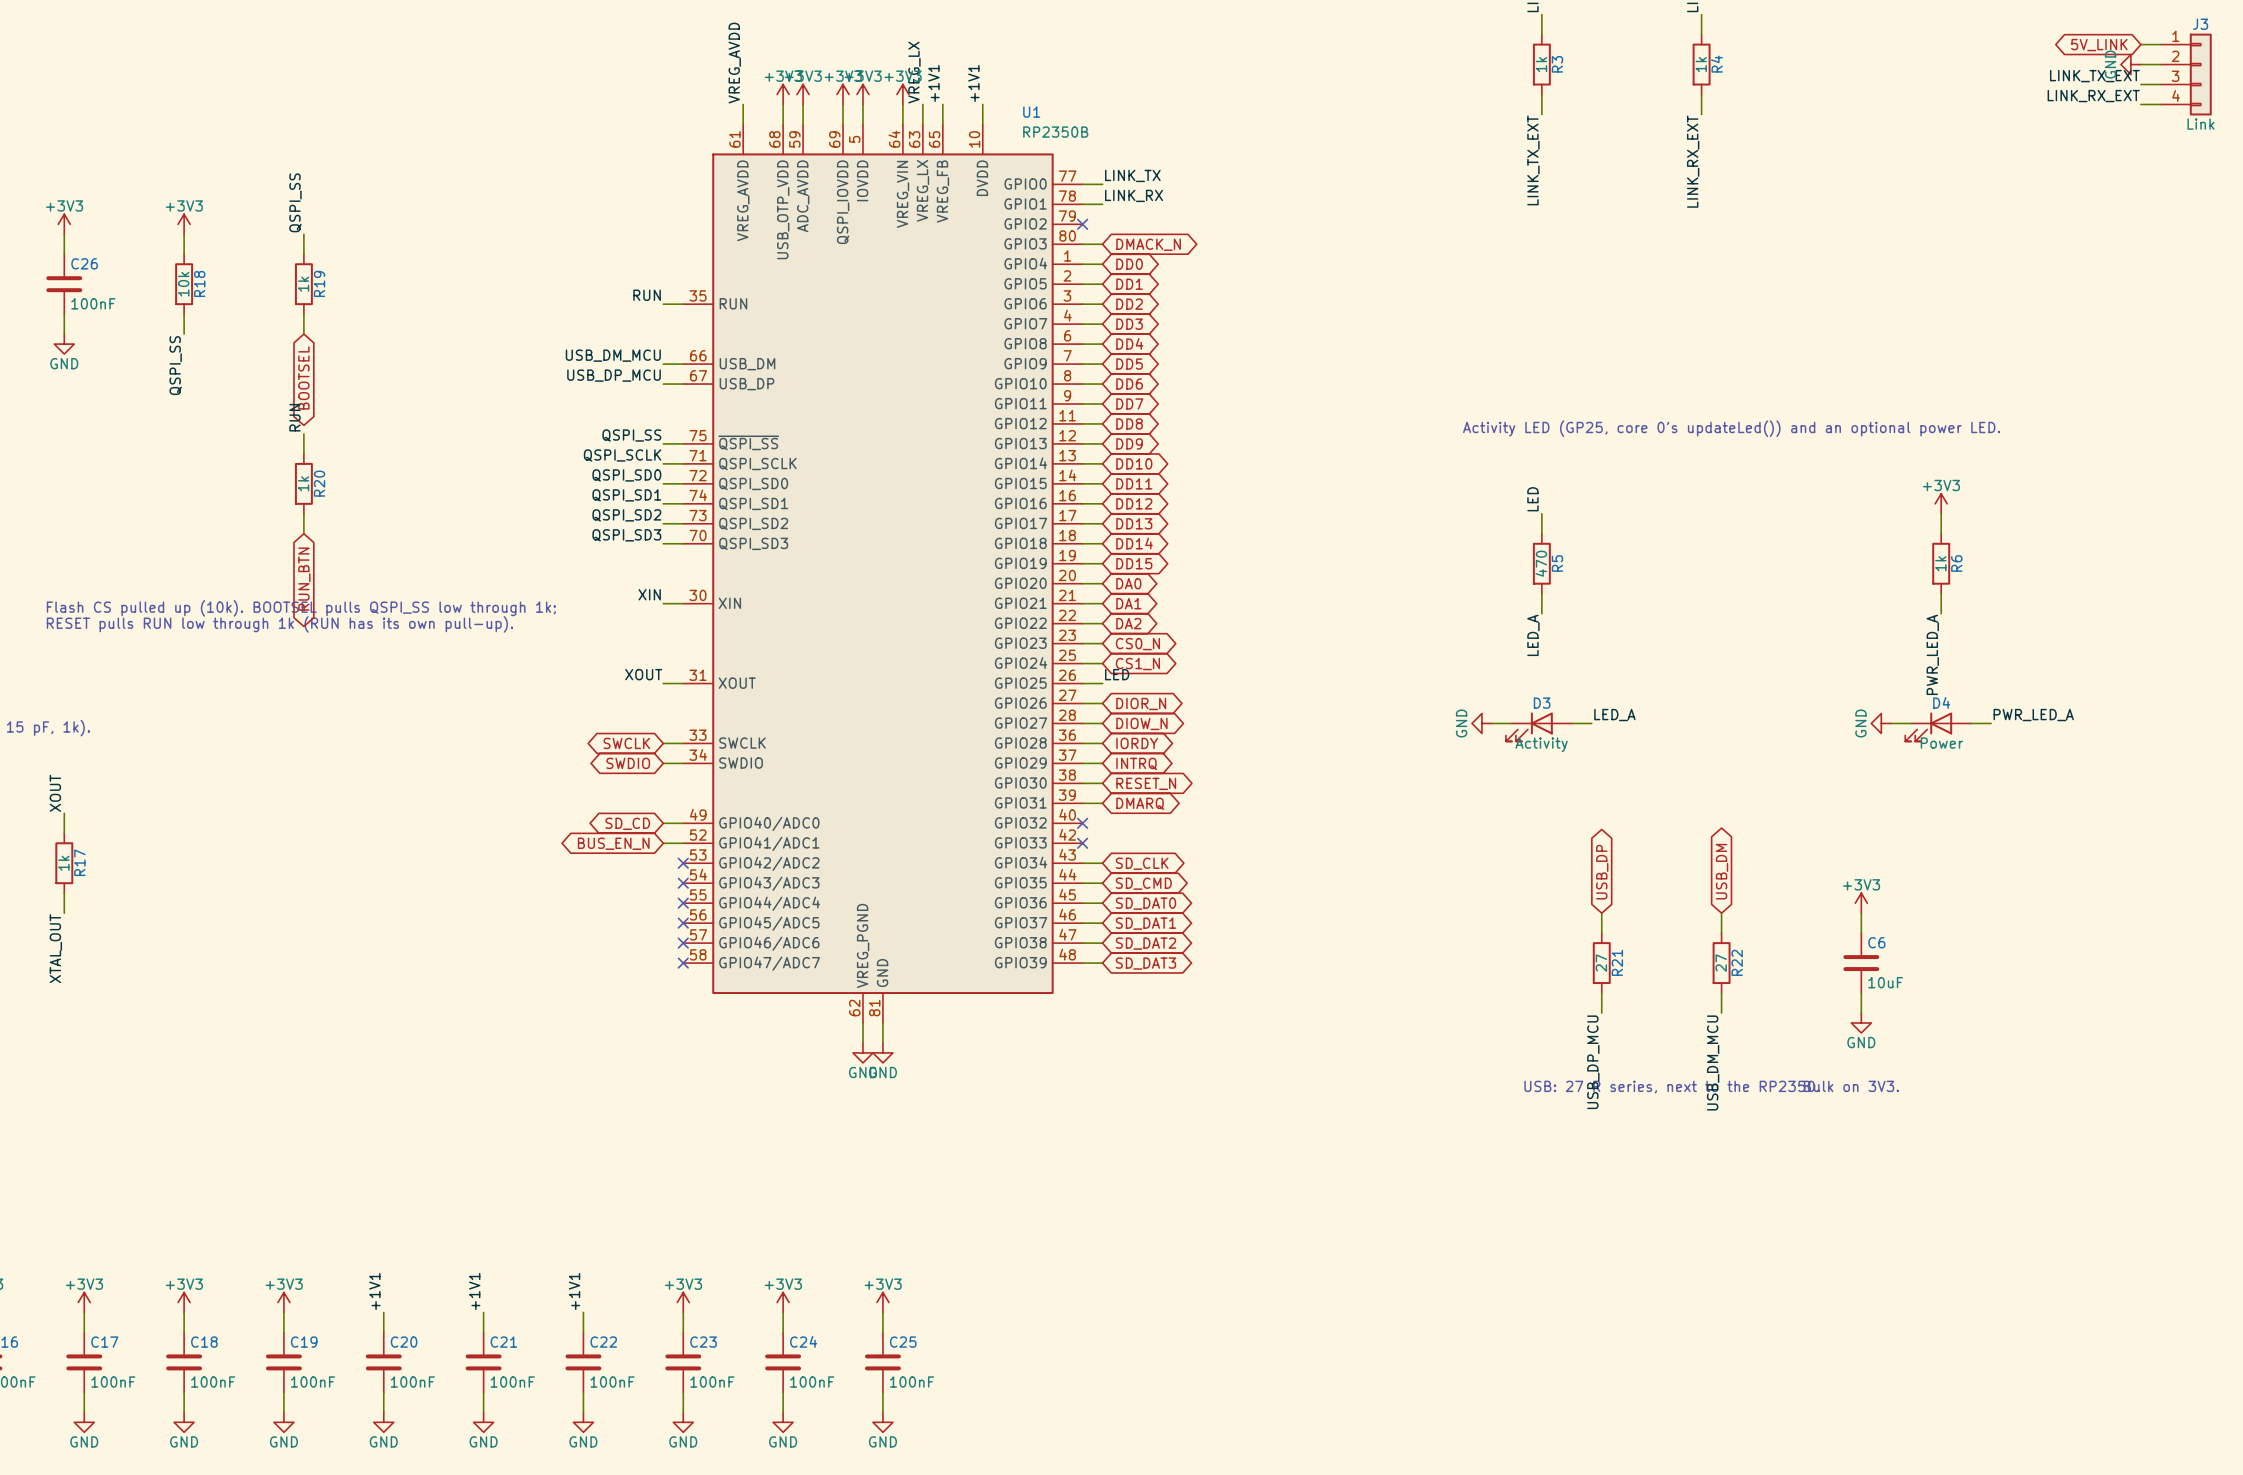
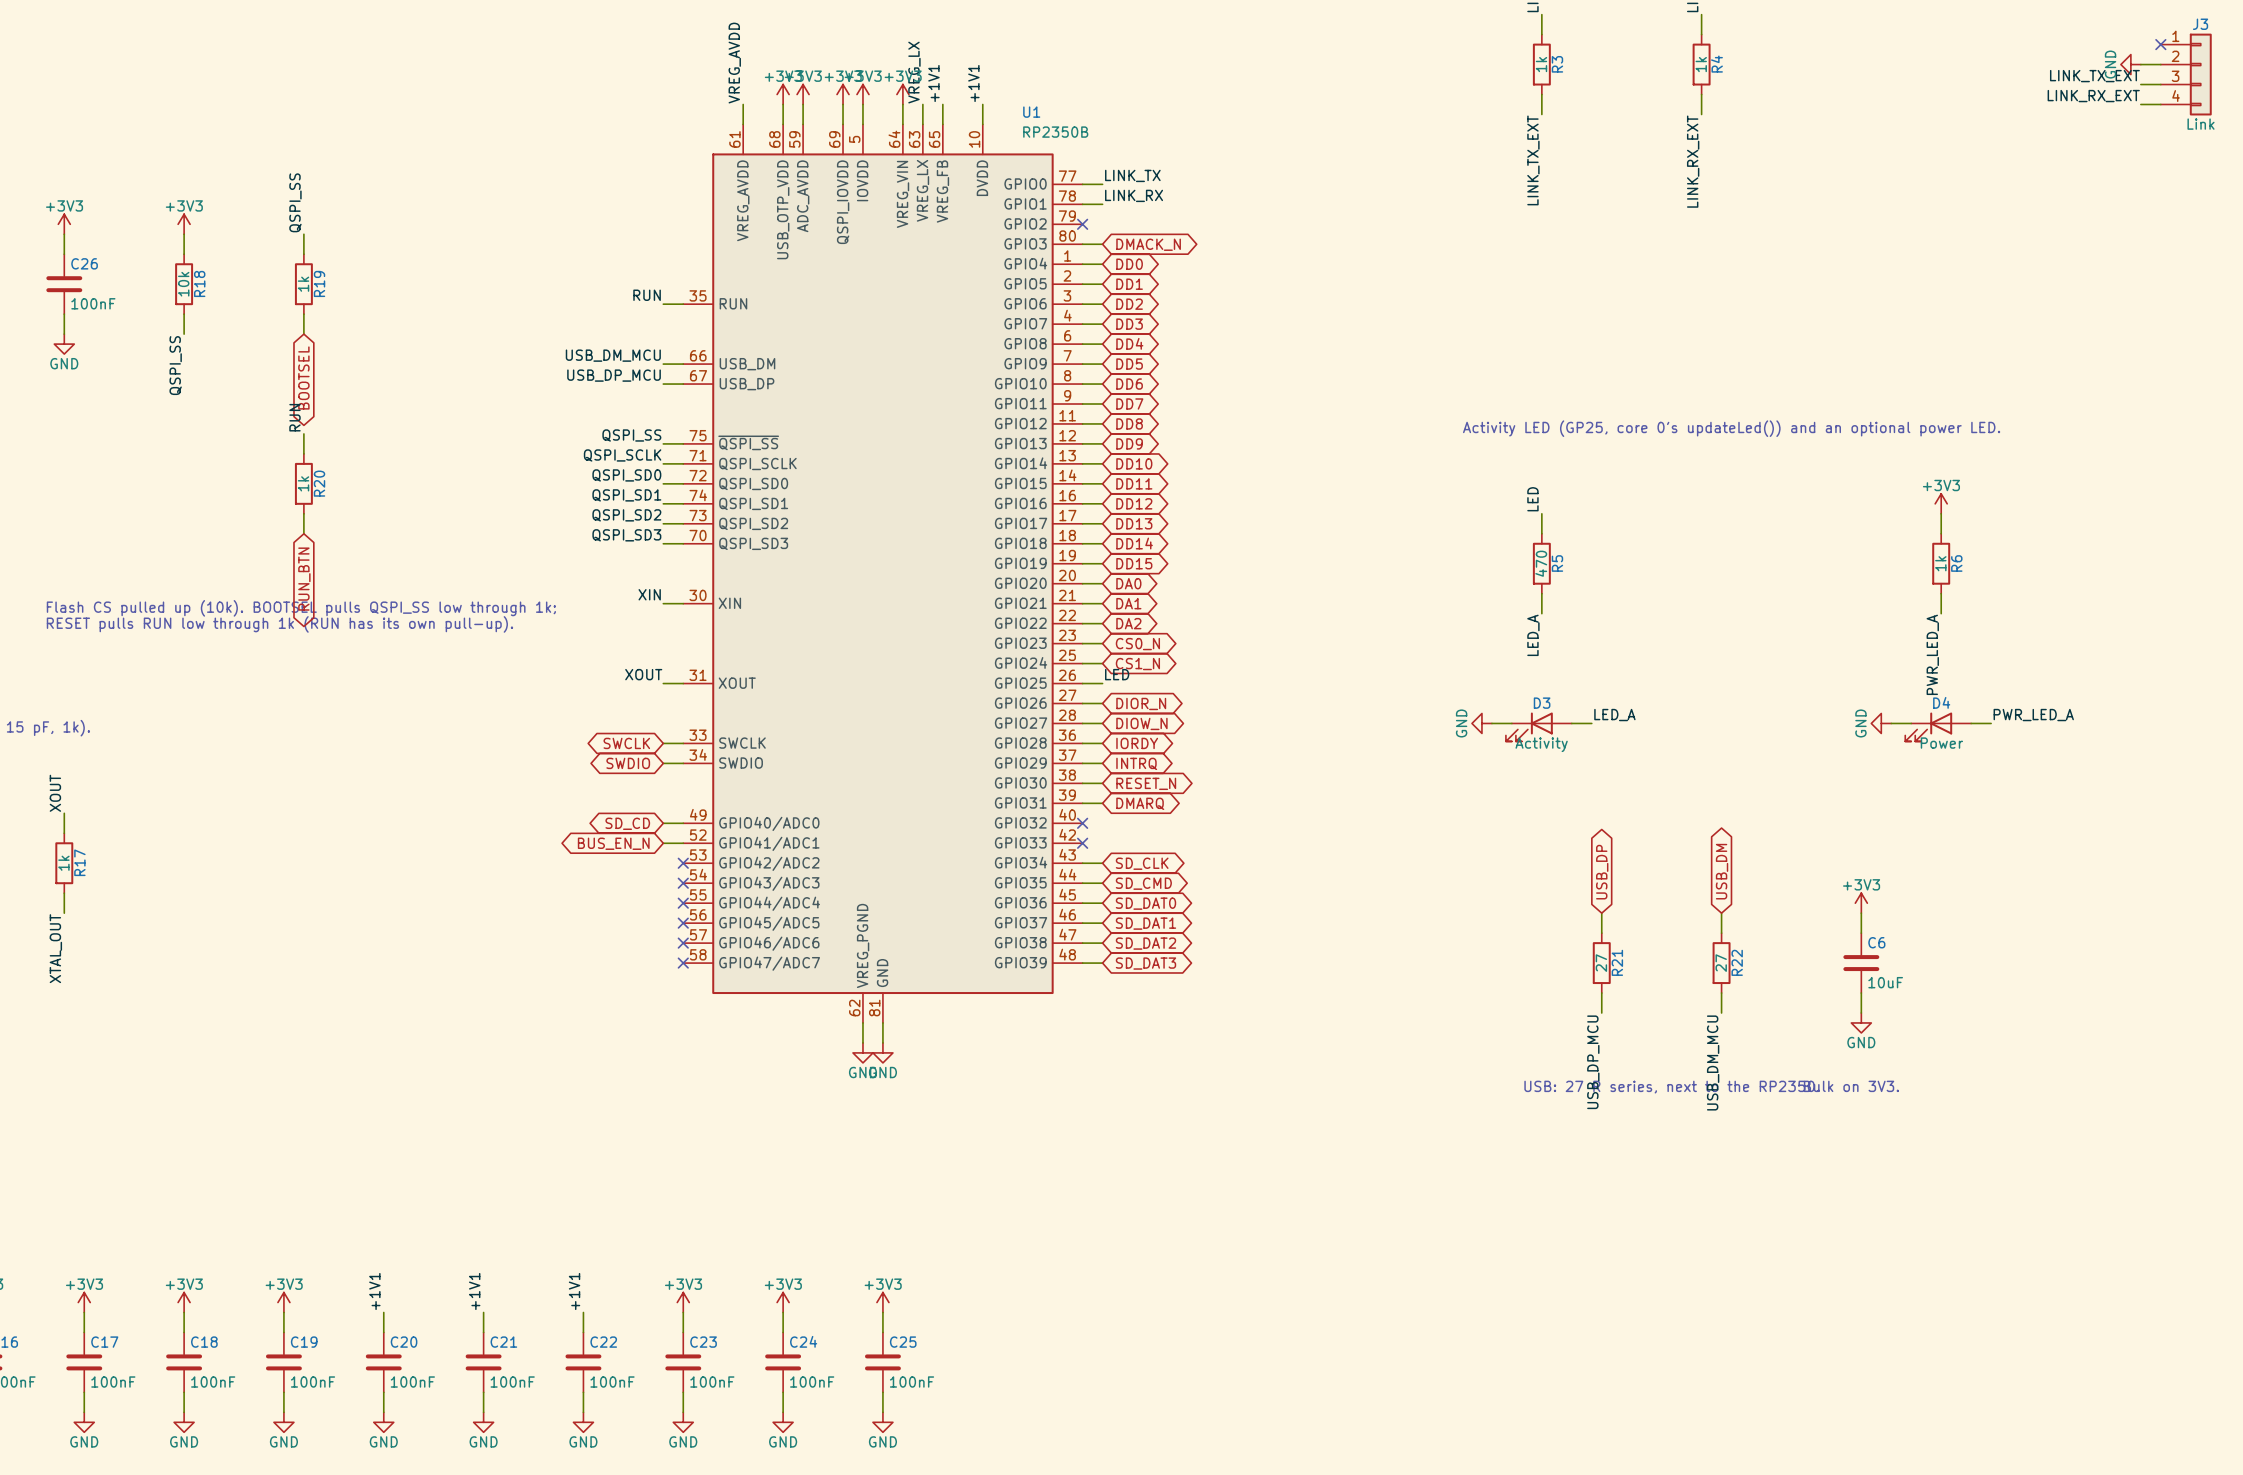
wire: (2140, 44) (2160, 44) -> none
no-connect mark: none -> (2160, 44)
global label: 5V_LINK (2099, 45) -> none

